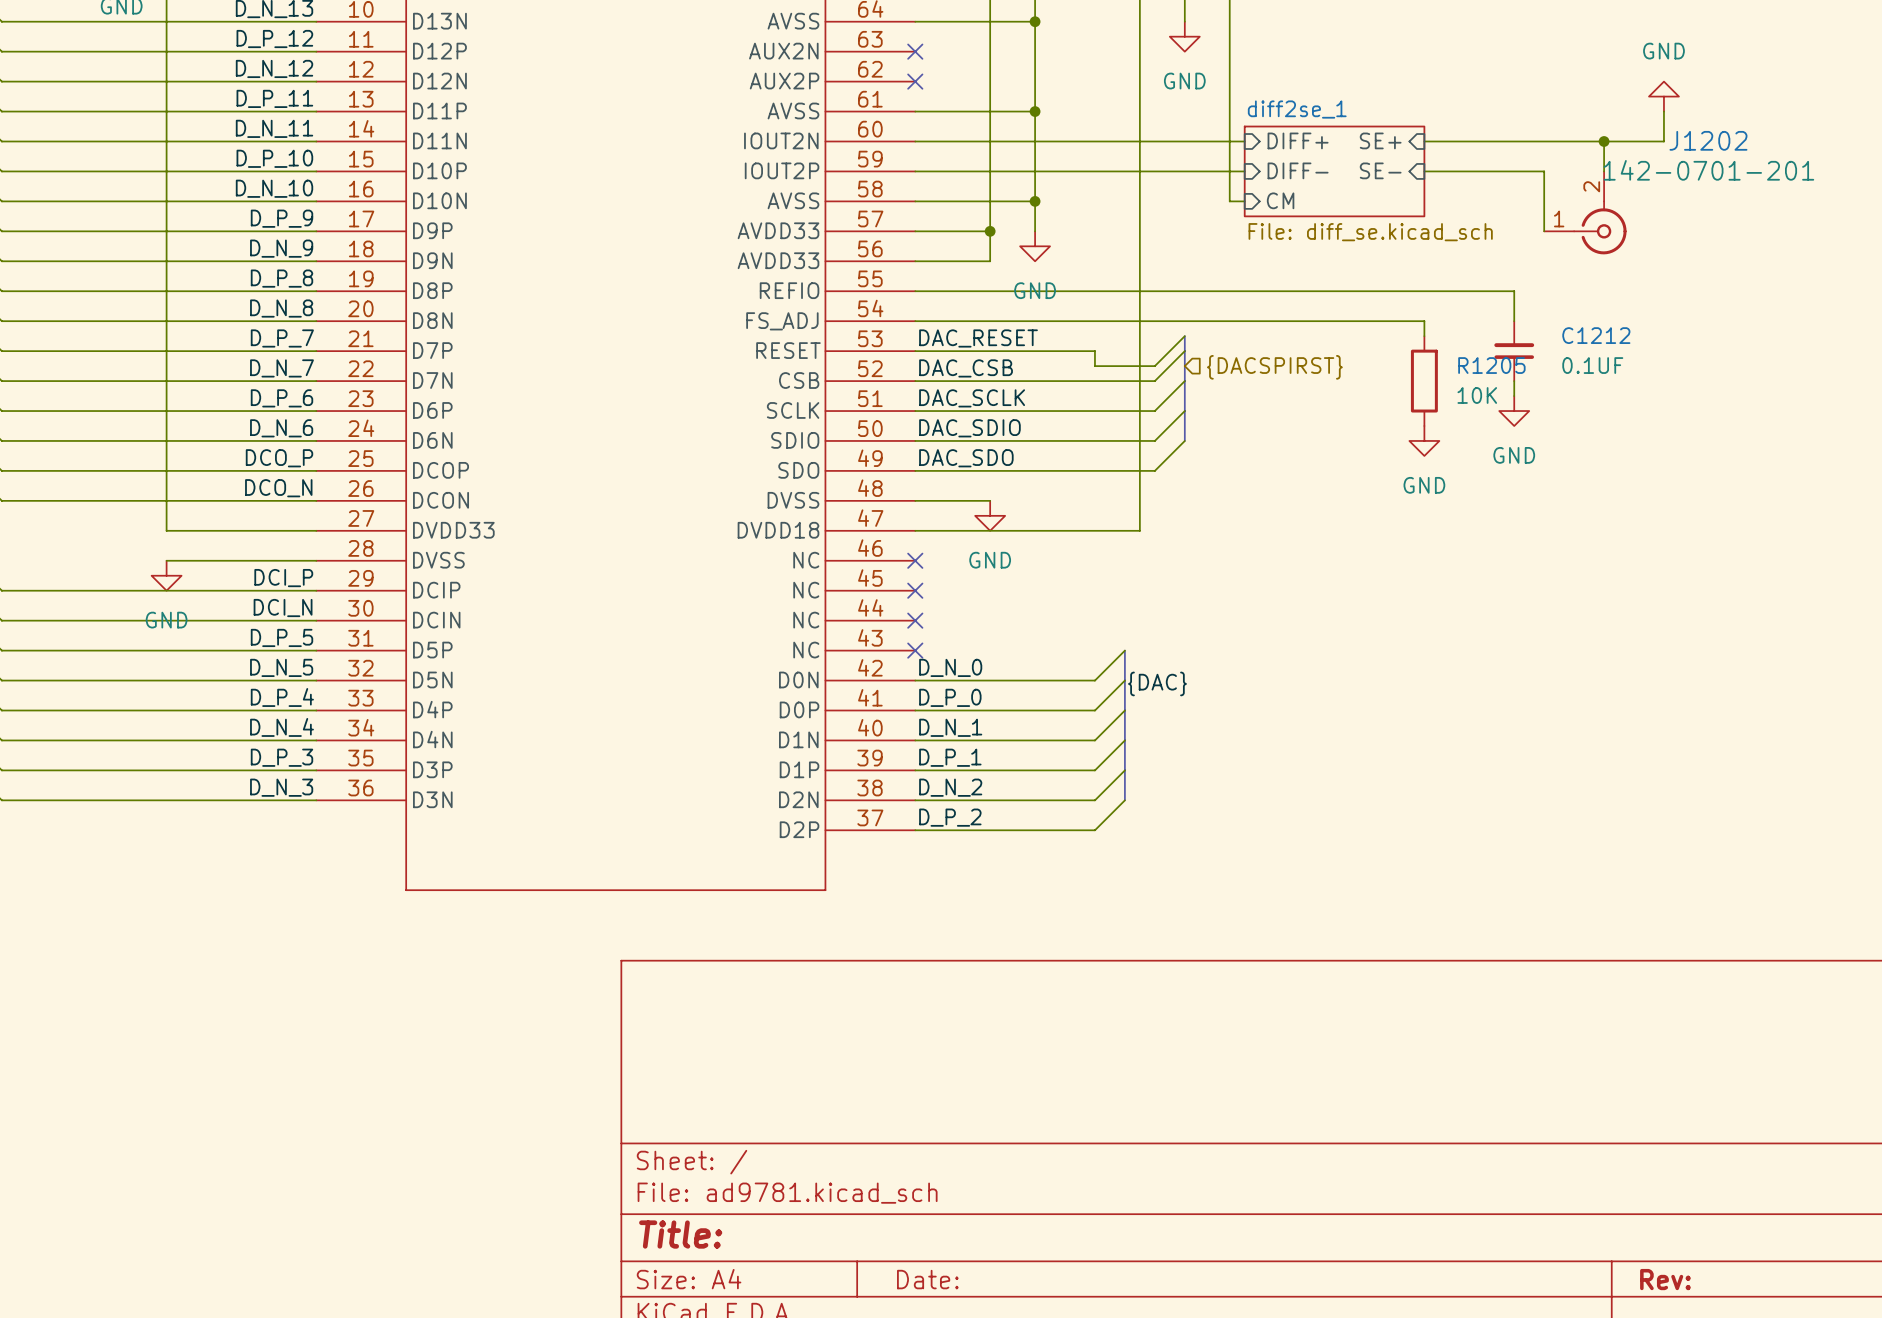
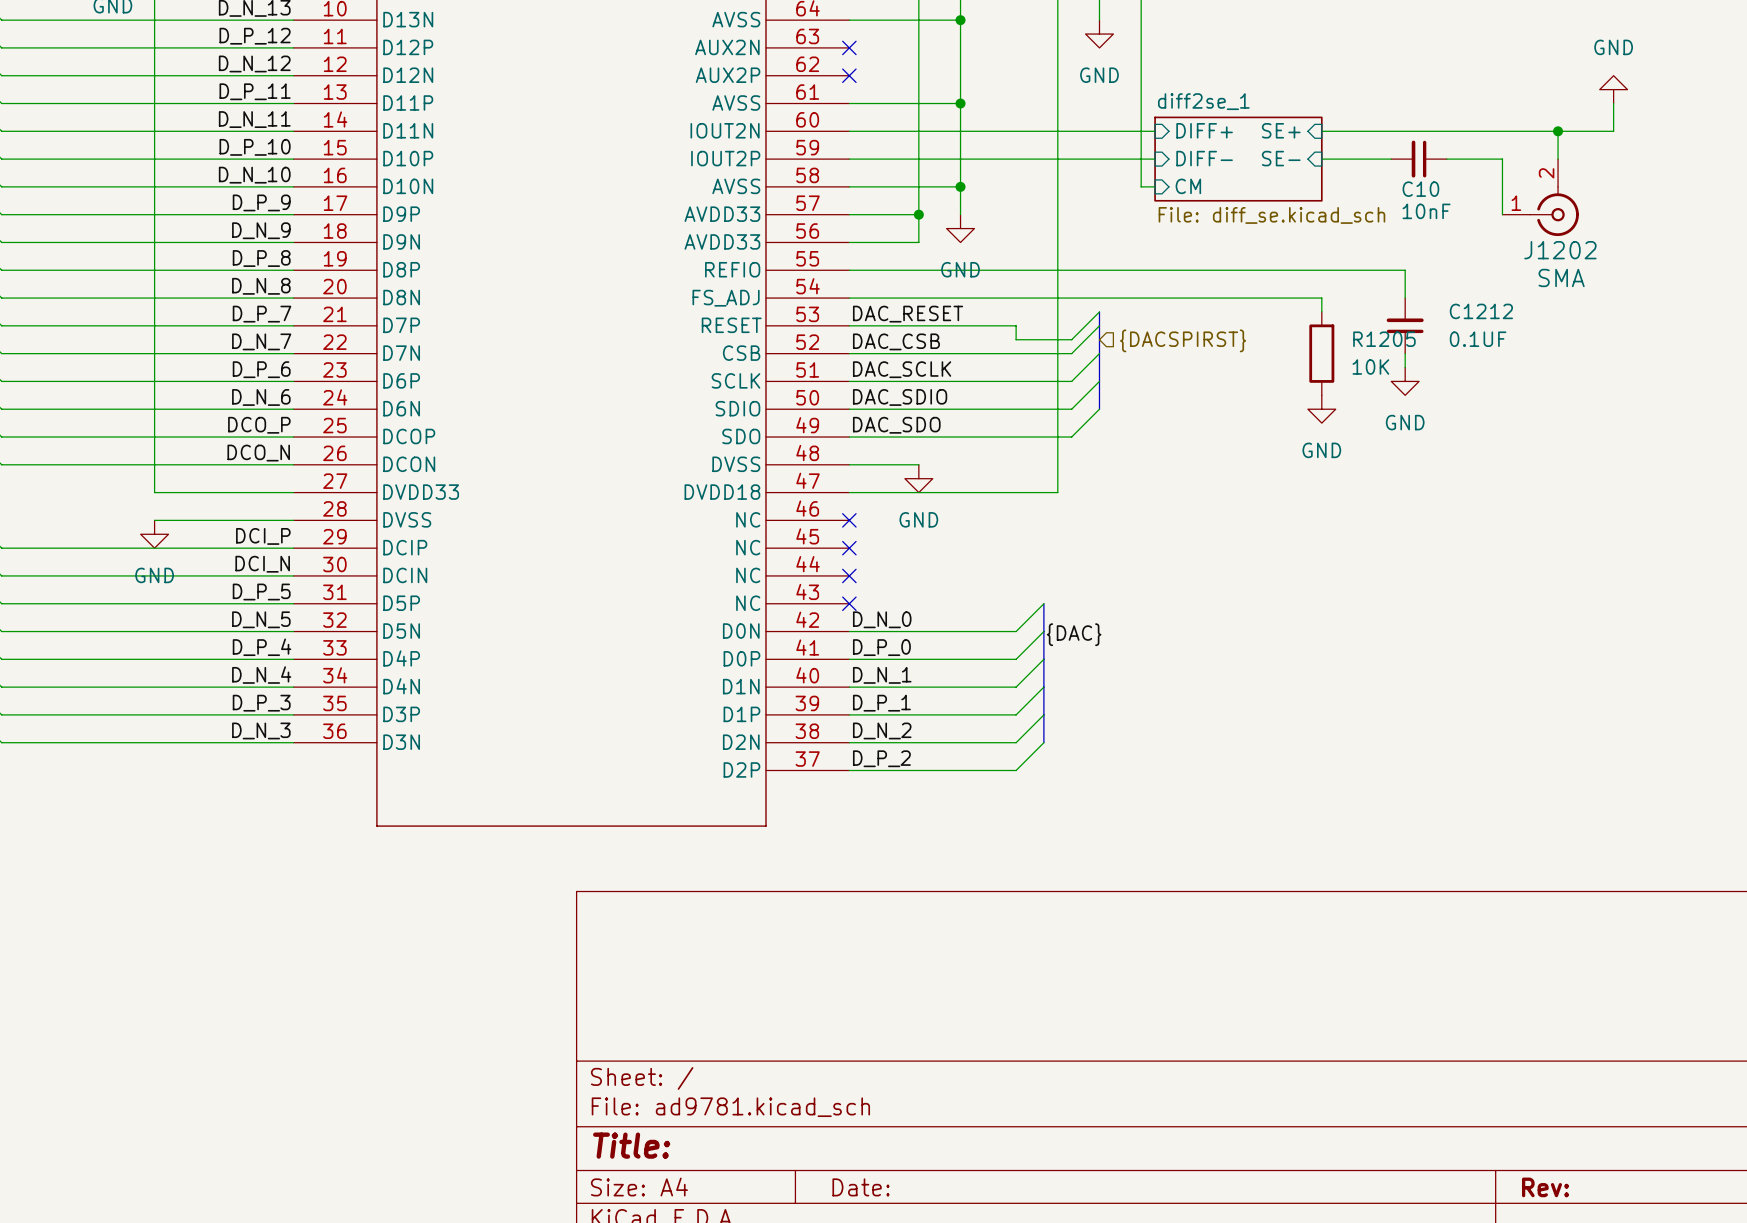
power symbol position: GND (1663, 96) -> GND (1613, 89)
wire: (1663, 111) (1663, 141) -> (1613, 103) (1613, 131) (1544, 131)
J1202 name position: J1202 (1708, 140) -> J1202 (1560, 250)
wire: (1604, 141) (1604, 171) -> (1558, 131) (1558, 159)
junction: (1604, 141) -> none
junction: none -> (1558, 131)
J1202 value: 142-0701-201 (1708, 170) -> SMA (1561, 277)
wire: (1499, 171) (1544, 171) (1544, 231) -> none
C10: none -> 10nF (1419, 159)
wire: none -> (1446, 159) (1502, 159) (1502, 214)
J1202 position: (1585, 212) -> (1540, 197)

